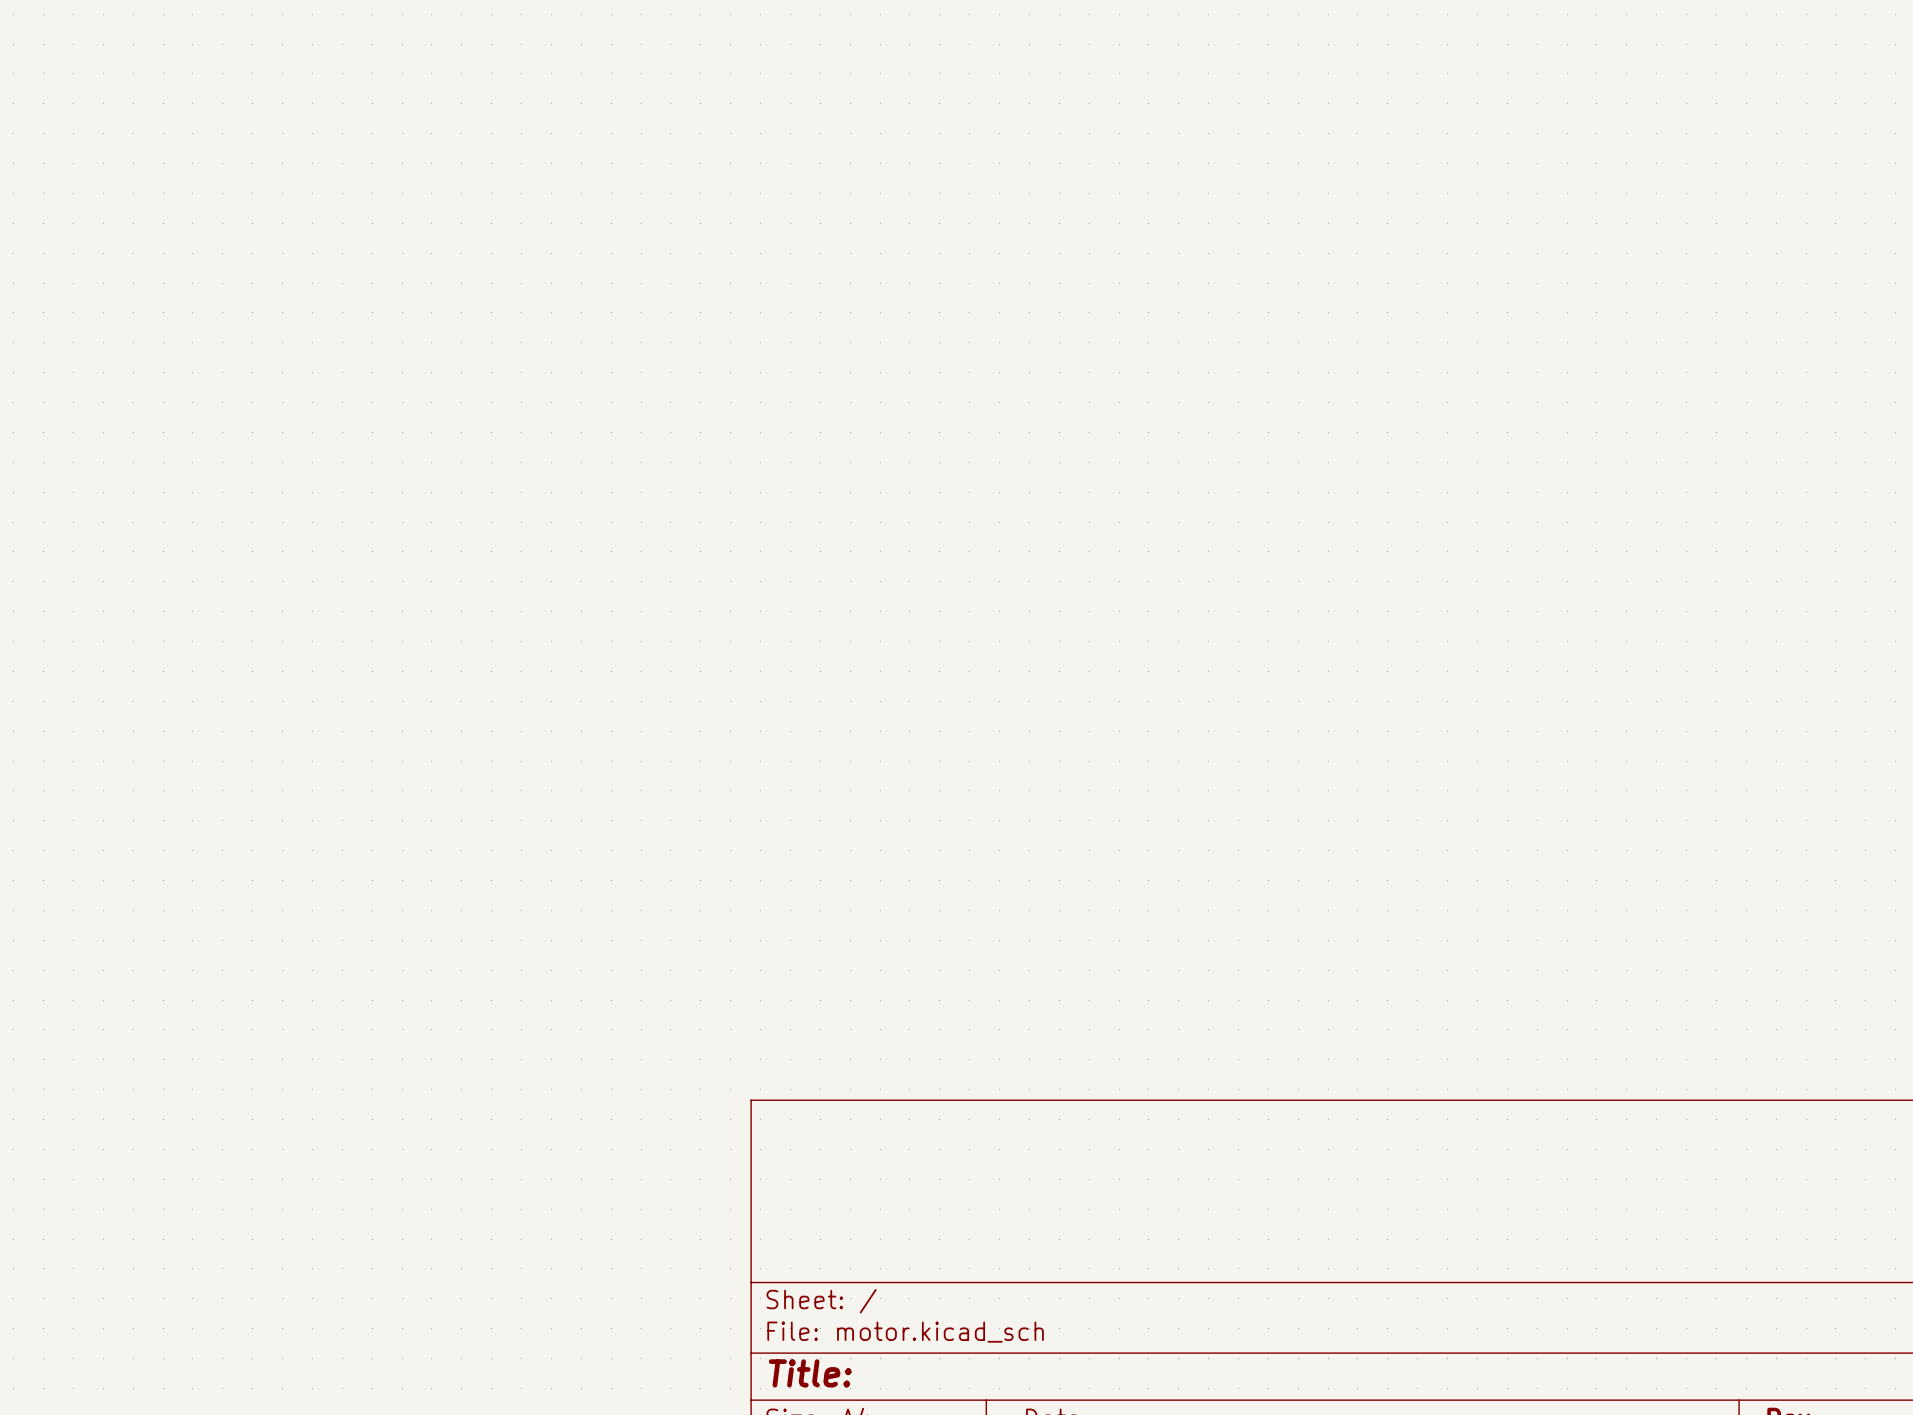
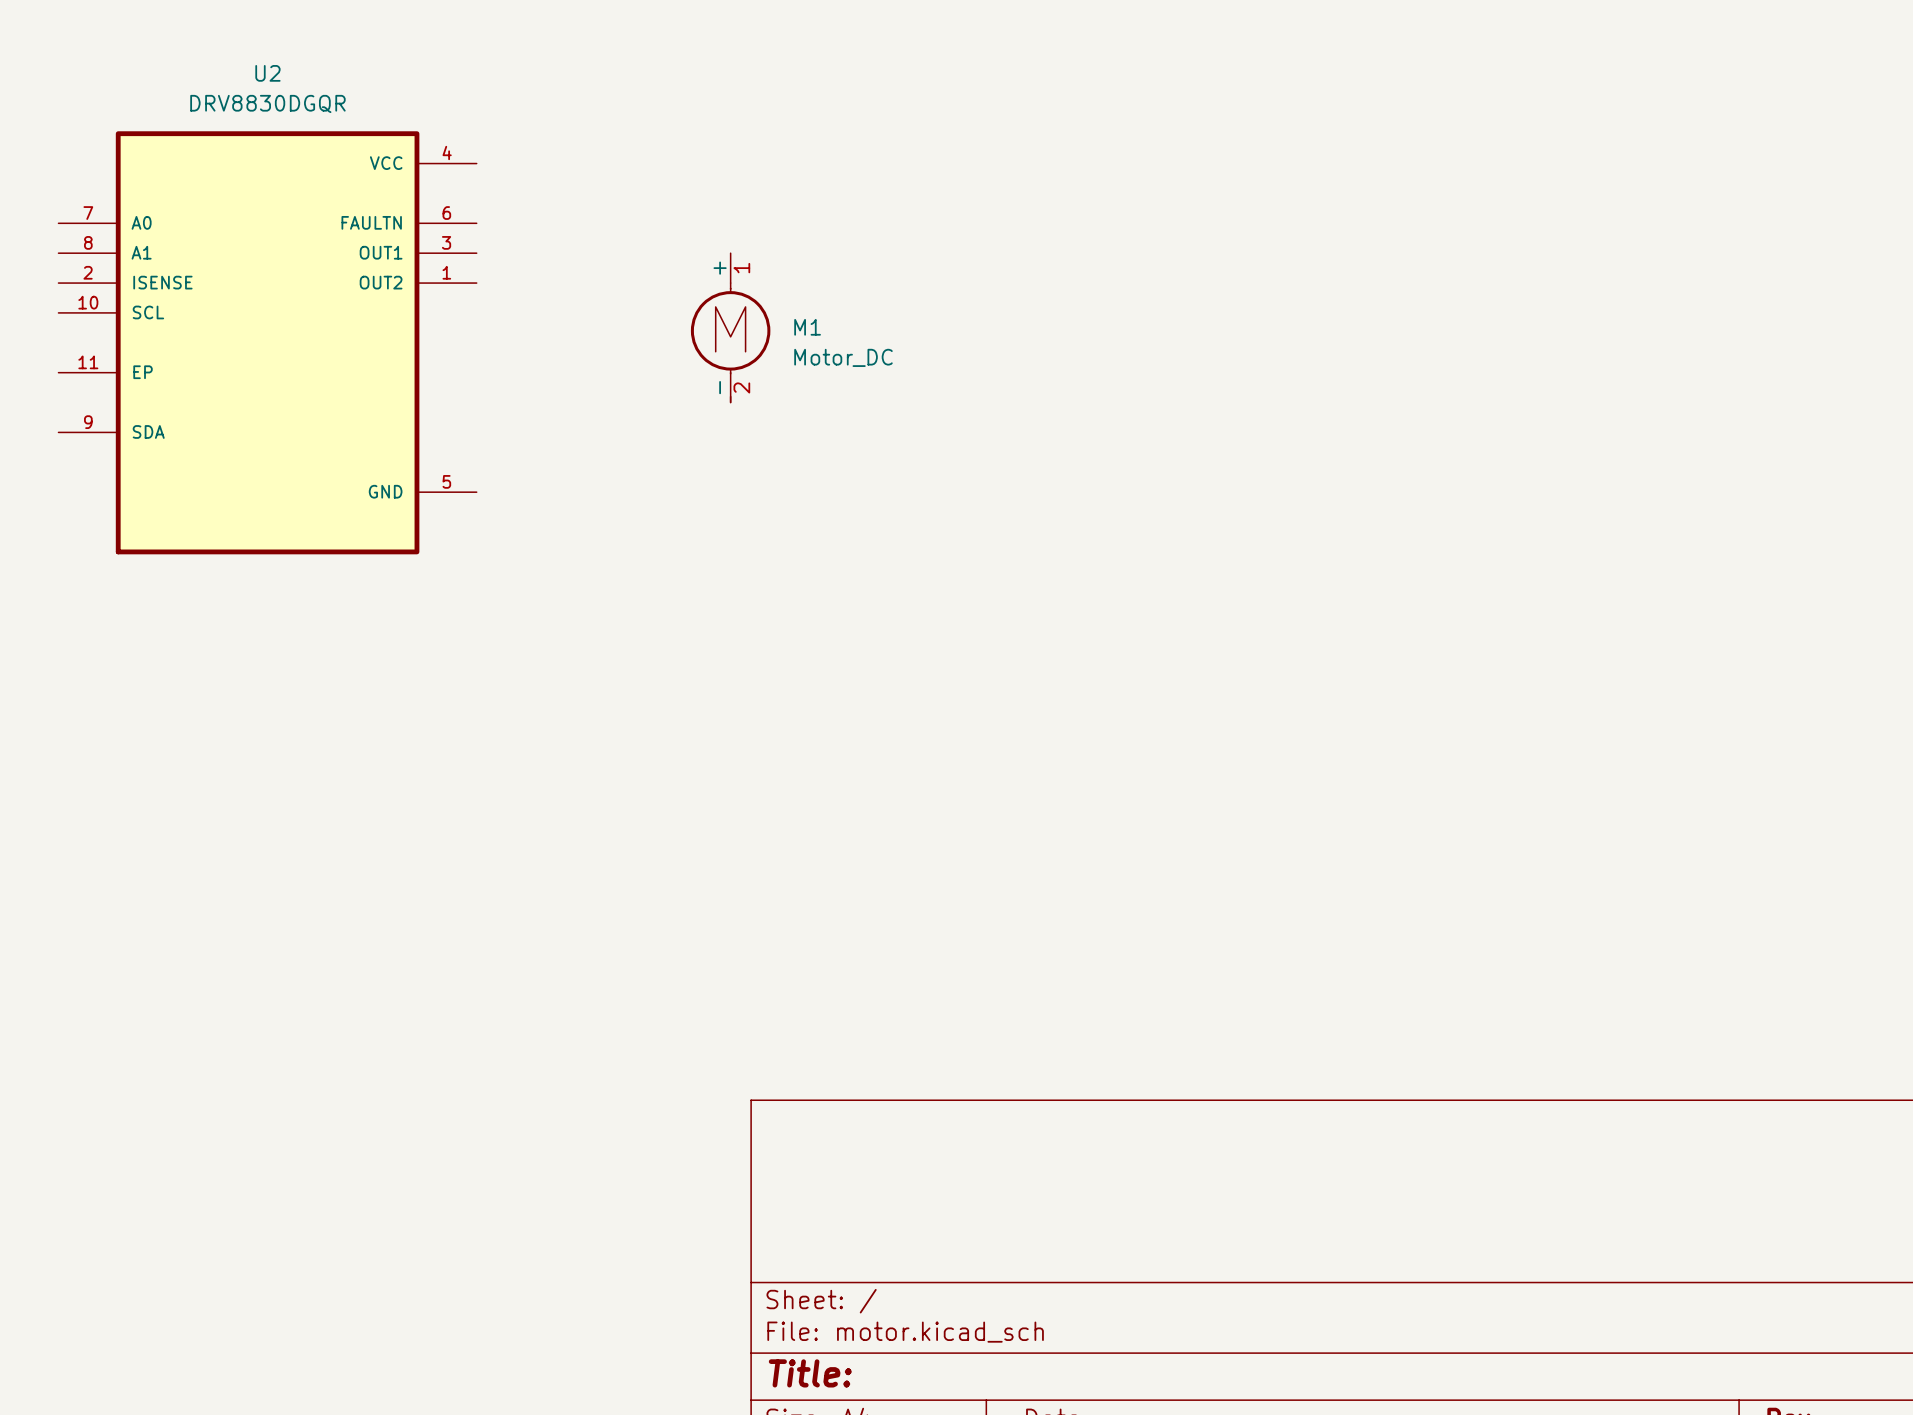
M1: none -> Motor_DC (730, 327)
U2: none -> DRV8830DGQR (267, 342)

